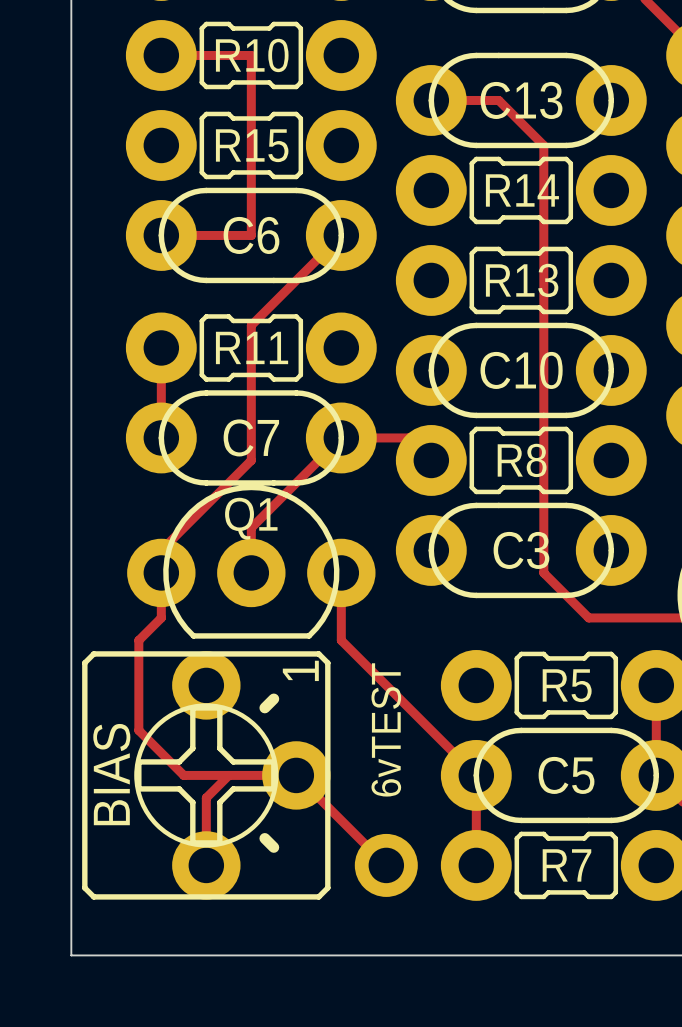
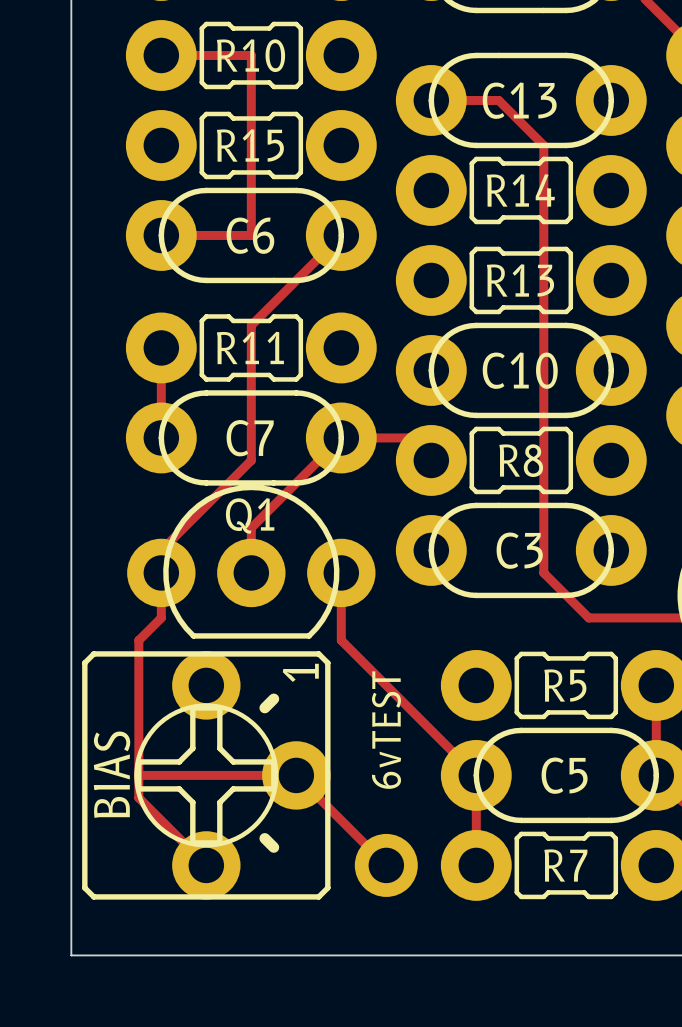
track: (138, 730) (183, 775) -> (138, 775) (183, 775)
track: (228, 775) (206, 797) (206, 865) -> (138, 730) (138, 797) (206, 865)

